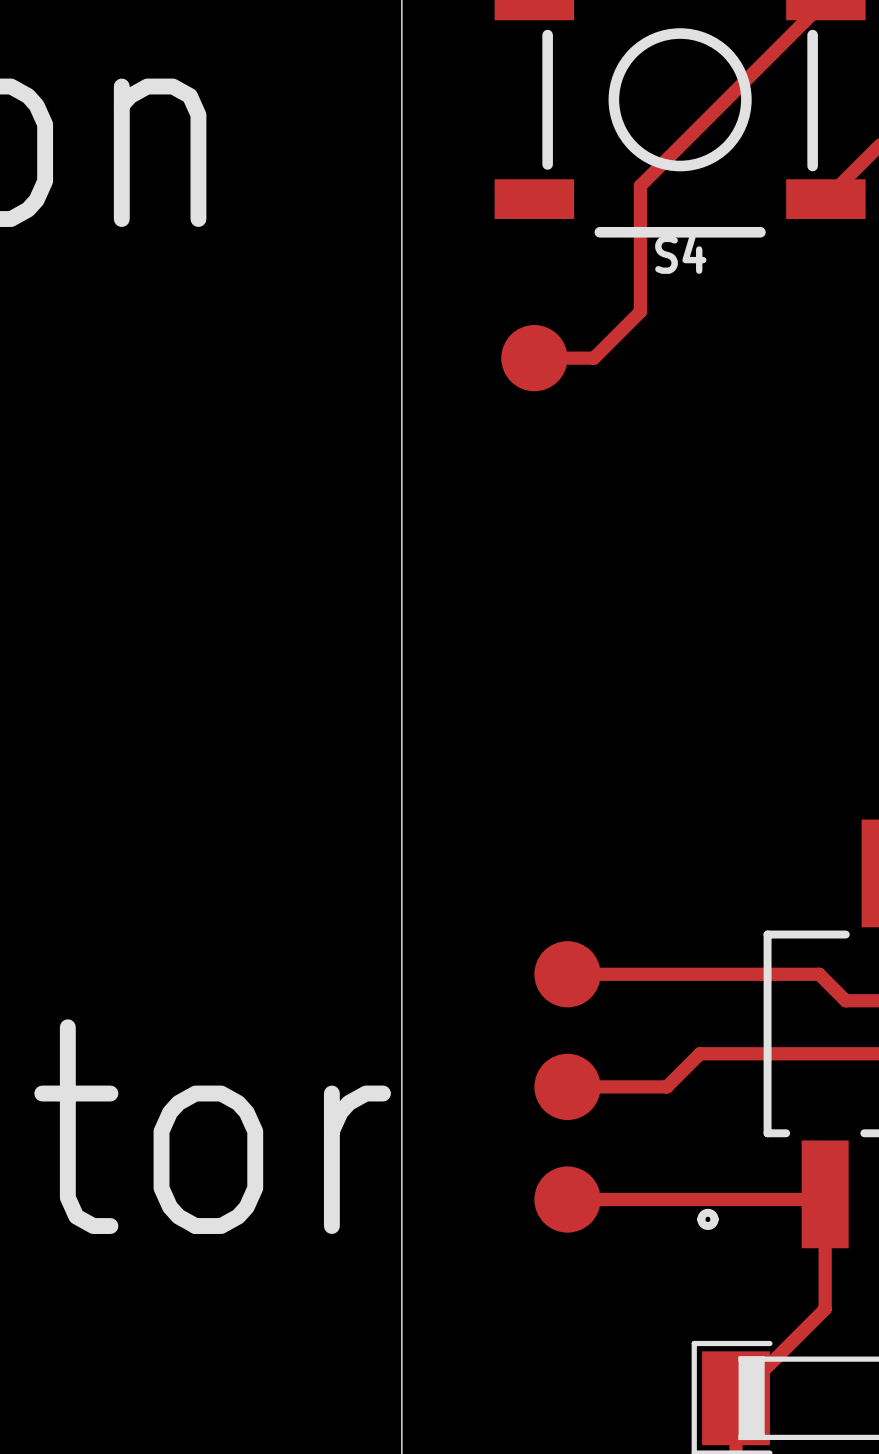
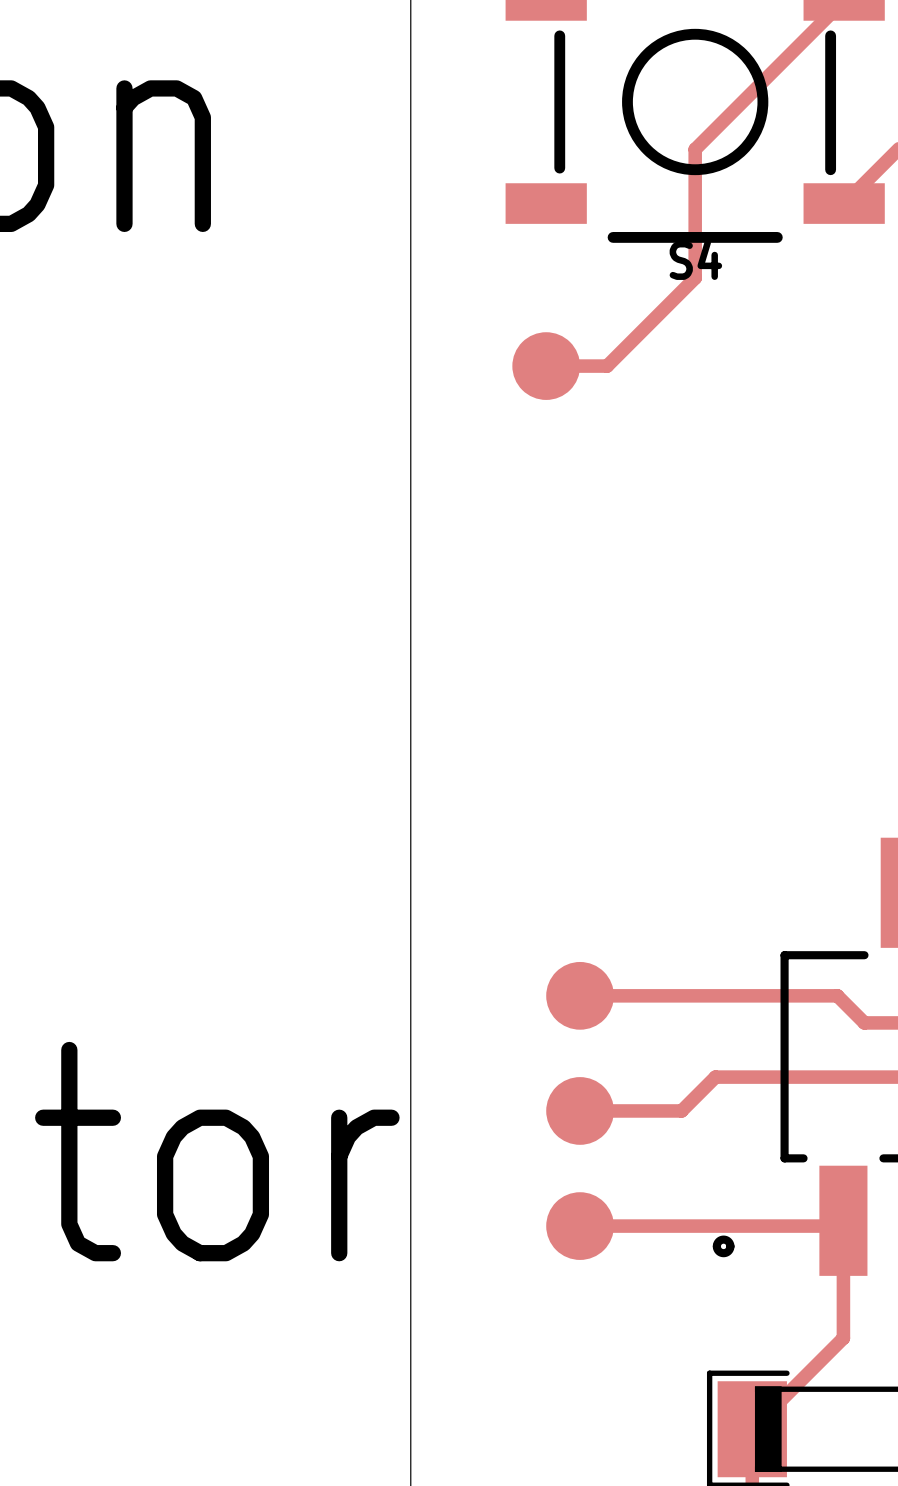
top track: (680, 146) (640, 185) (640, 311) -> (695, 149) (695, 278) (654, 318)

